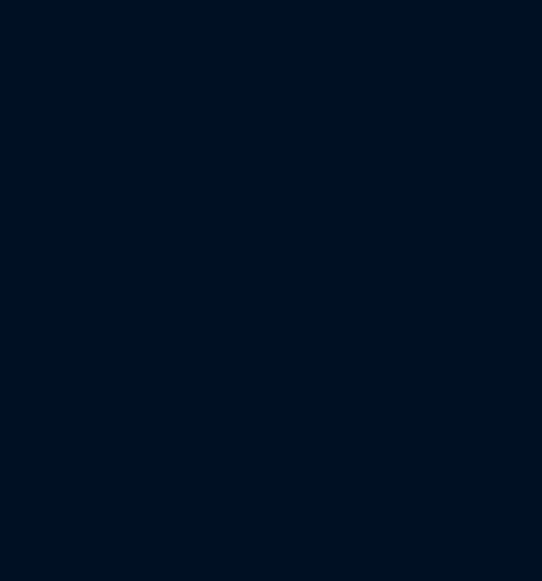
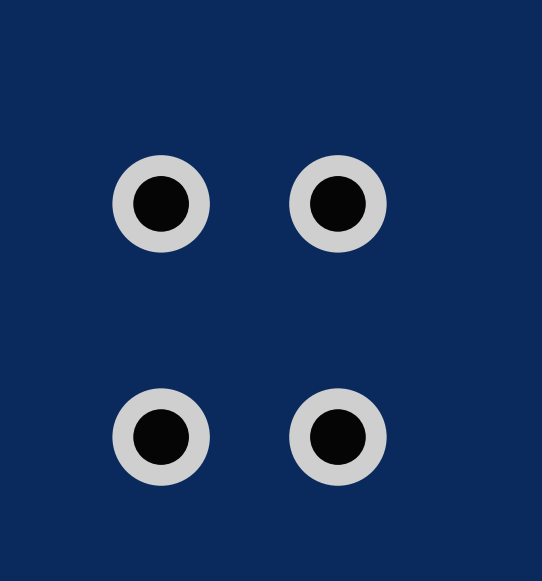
part: none -> (249, 203)
part: none -> (249, 437)

